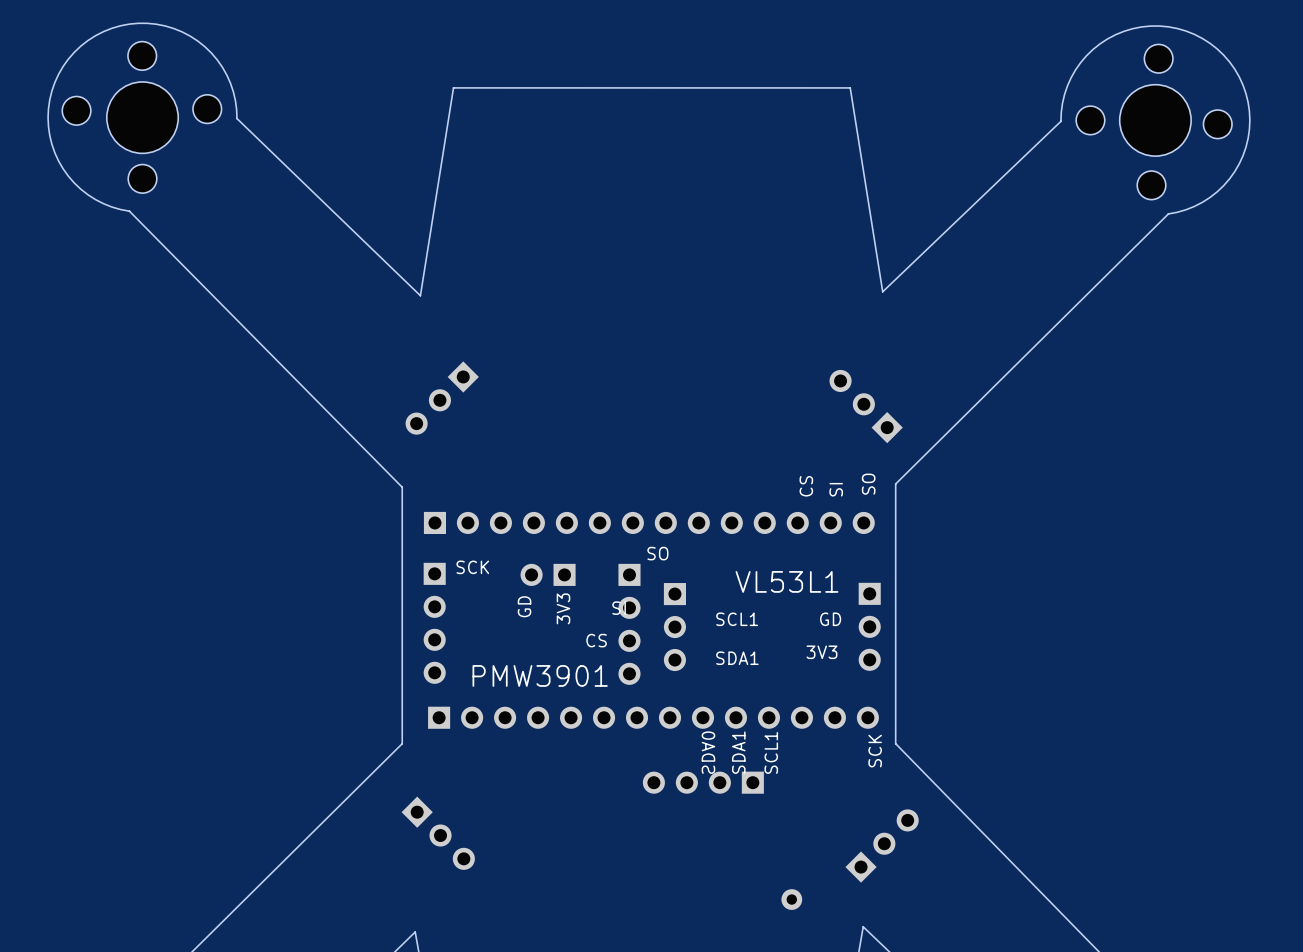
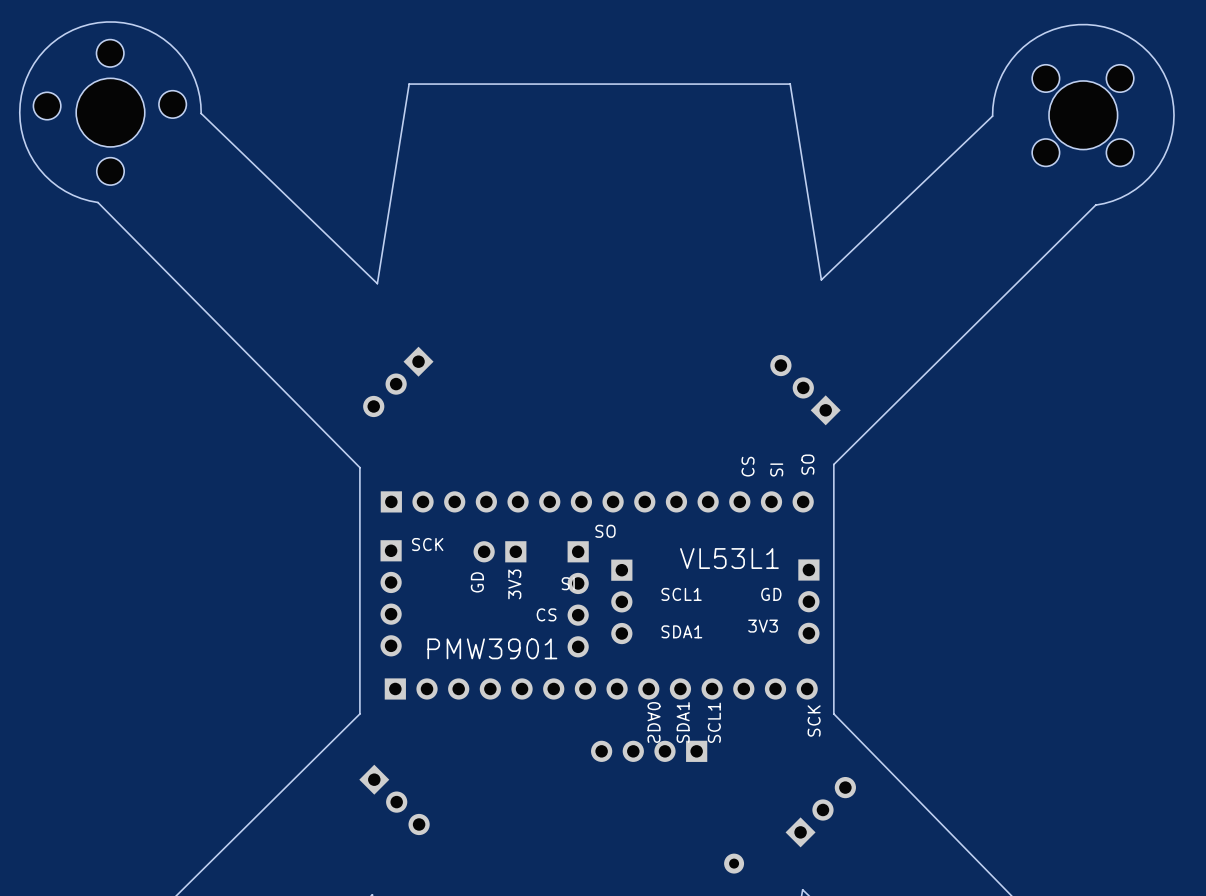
part: (1158, 58) -> none
part: none -> (1045, 78)
part: none -> (1120, 78)
part: (1090, 120) -> none
part: (1217, 124) -> none
part: none -> (1045, 152)
part: none -> (1120, 152)
part: (1151, 185) -> none

